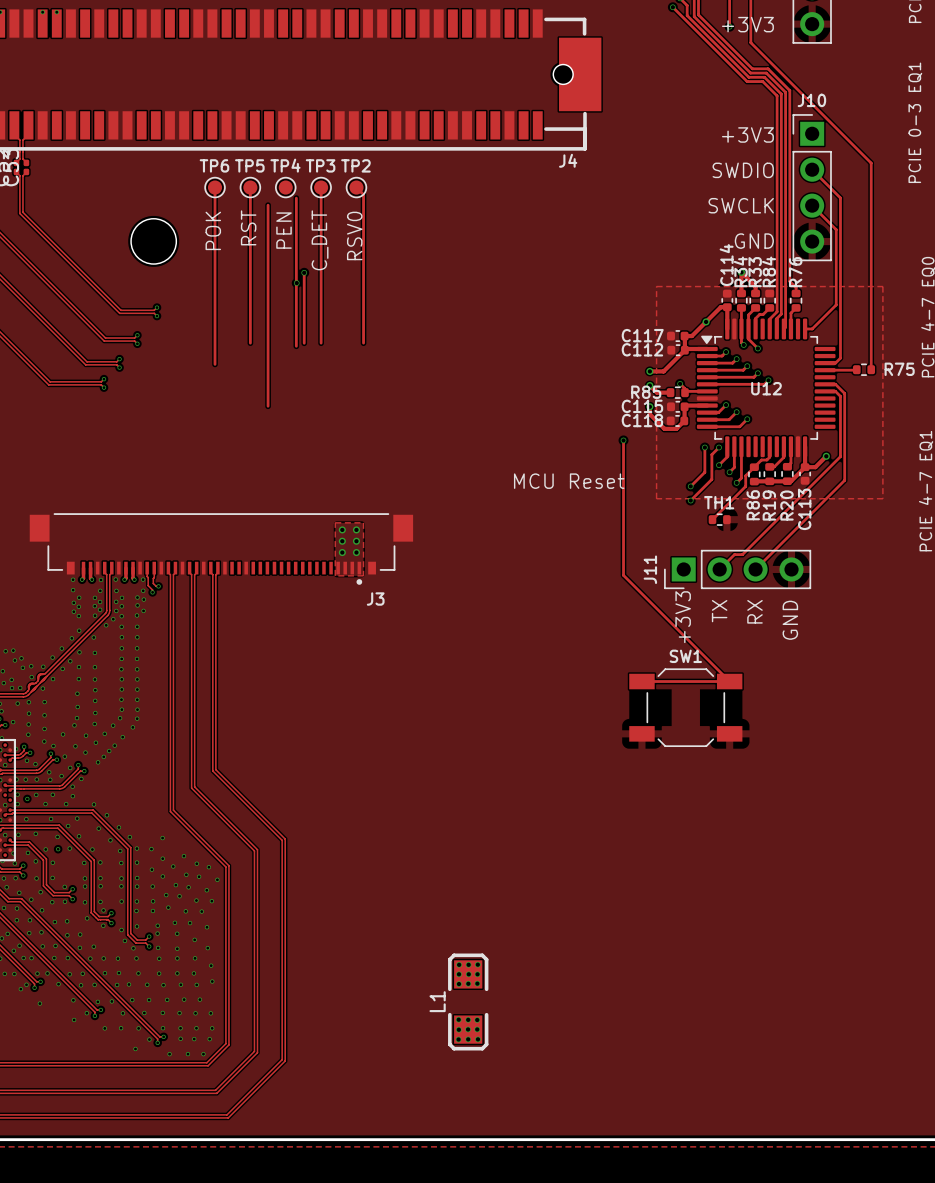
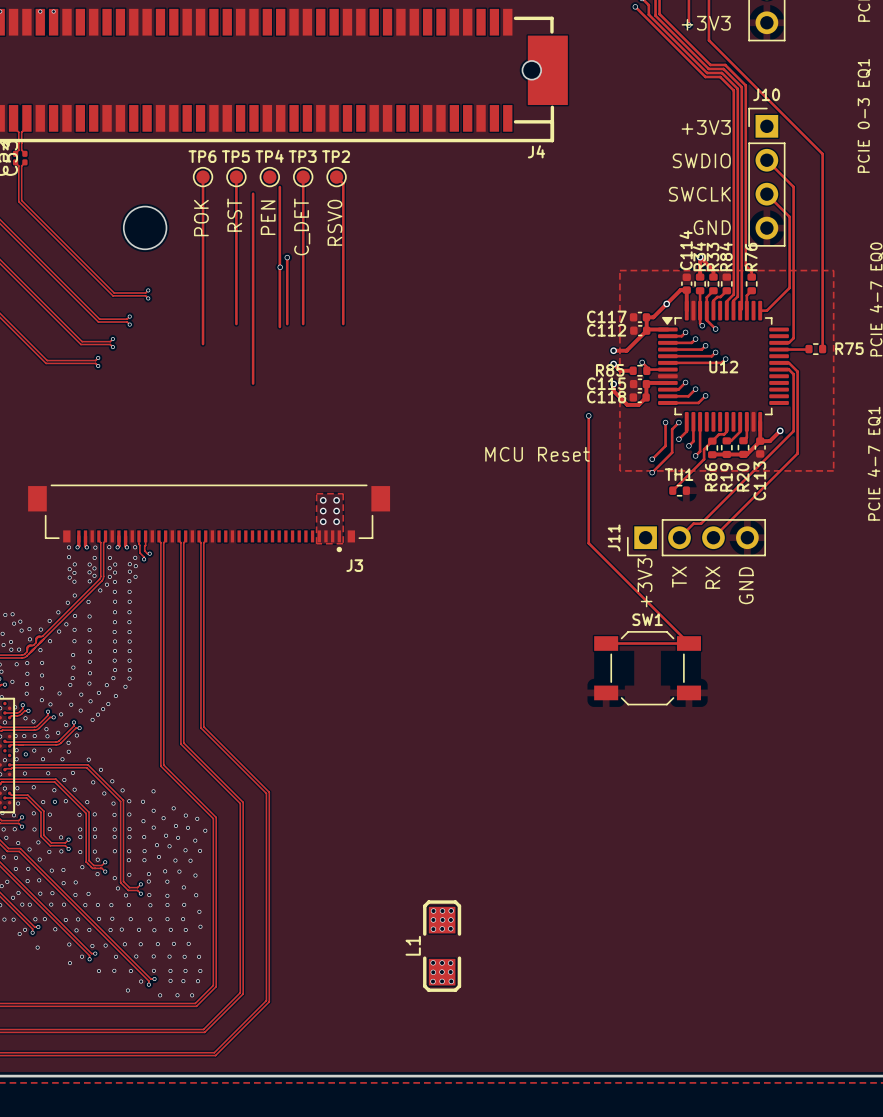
via: none -> (18, 803)
via: (27, 852) -> none
via: (13, 853) -> none

